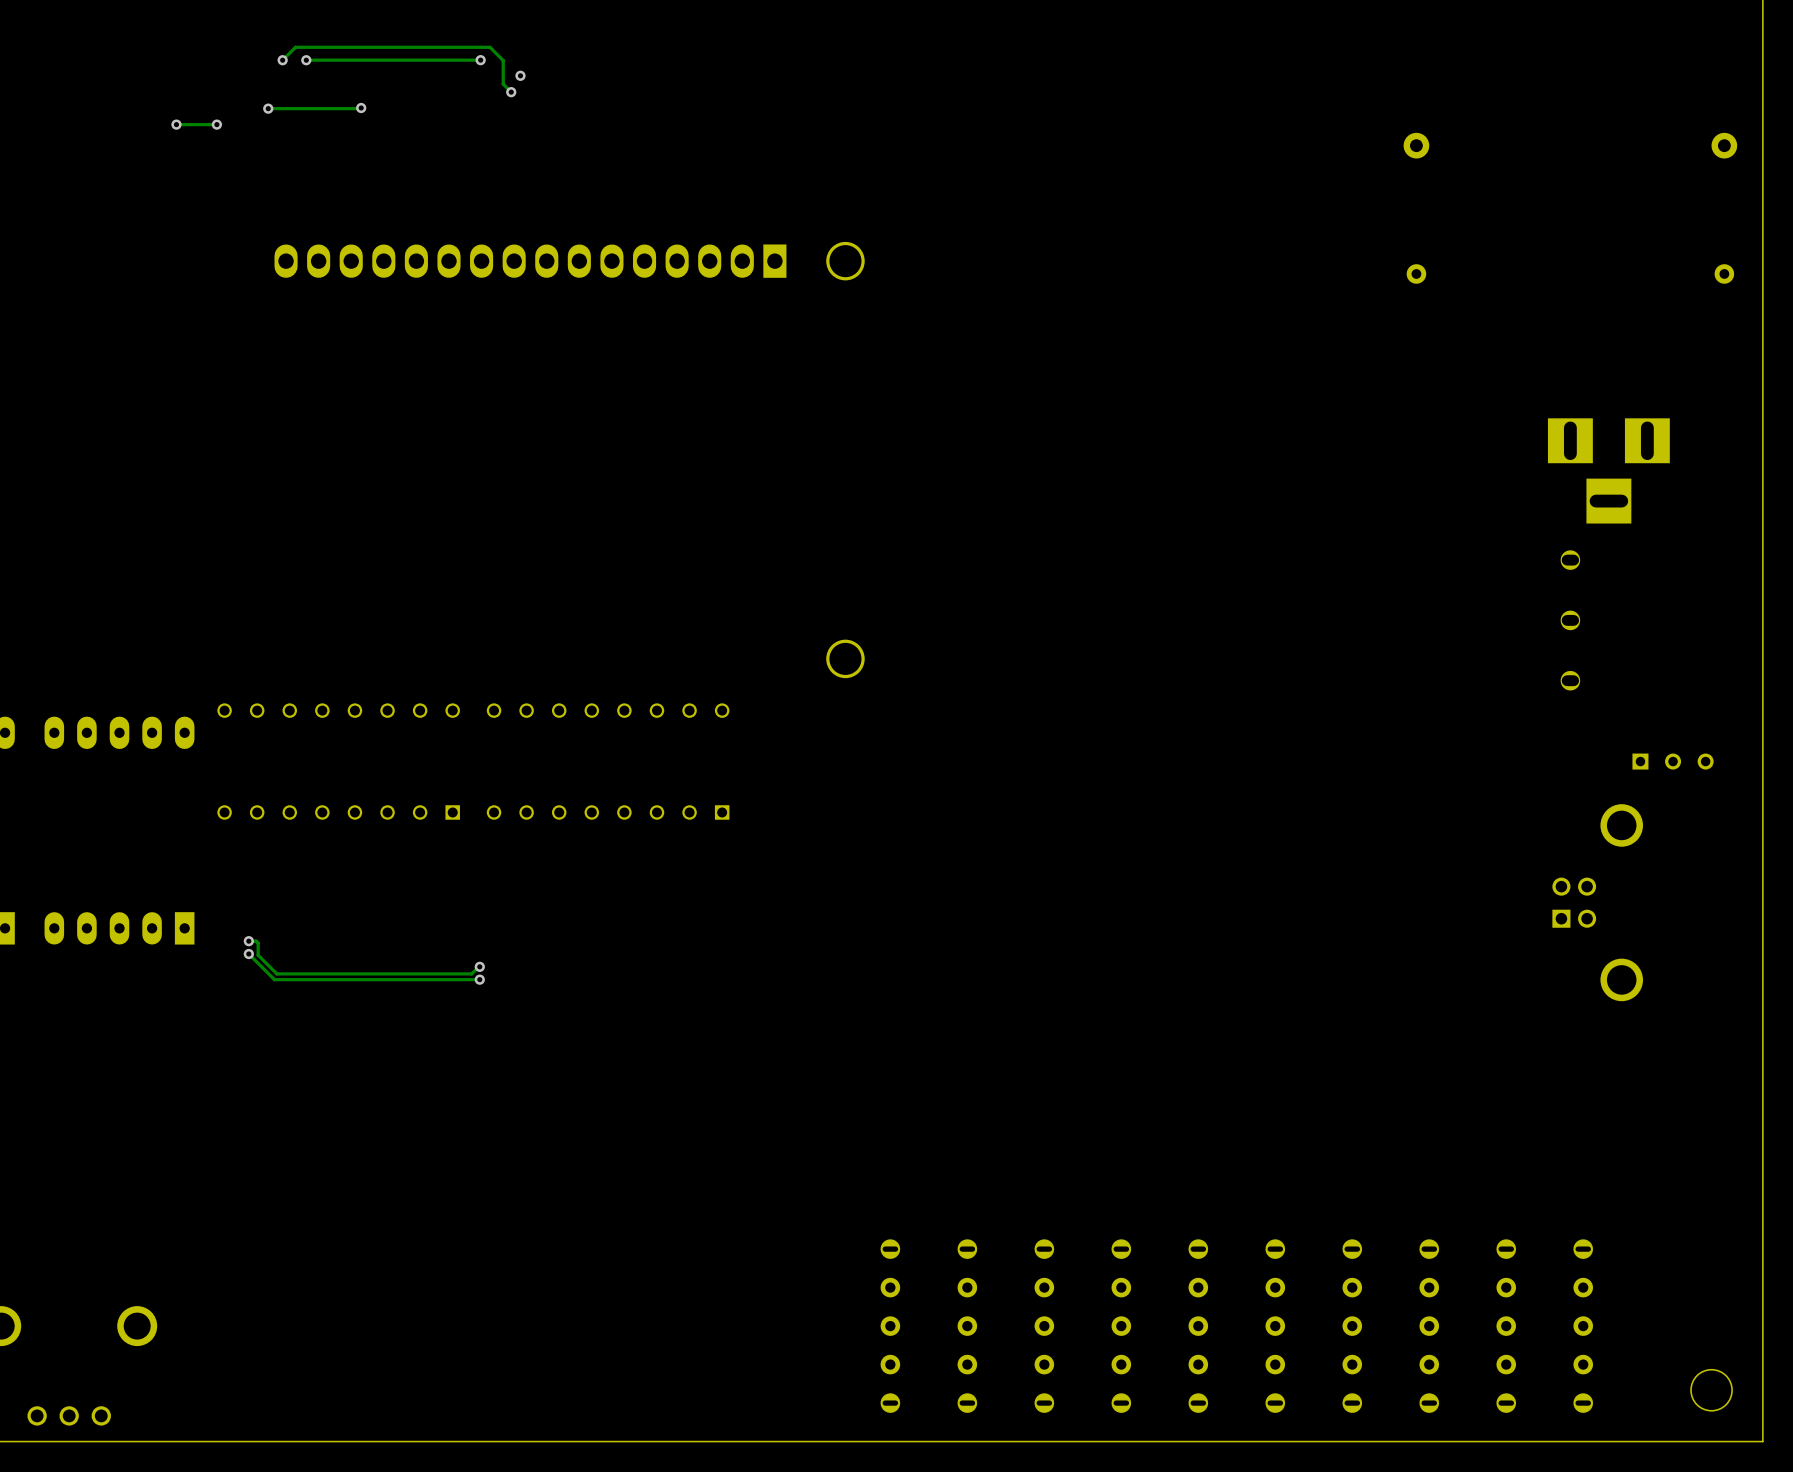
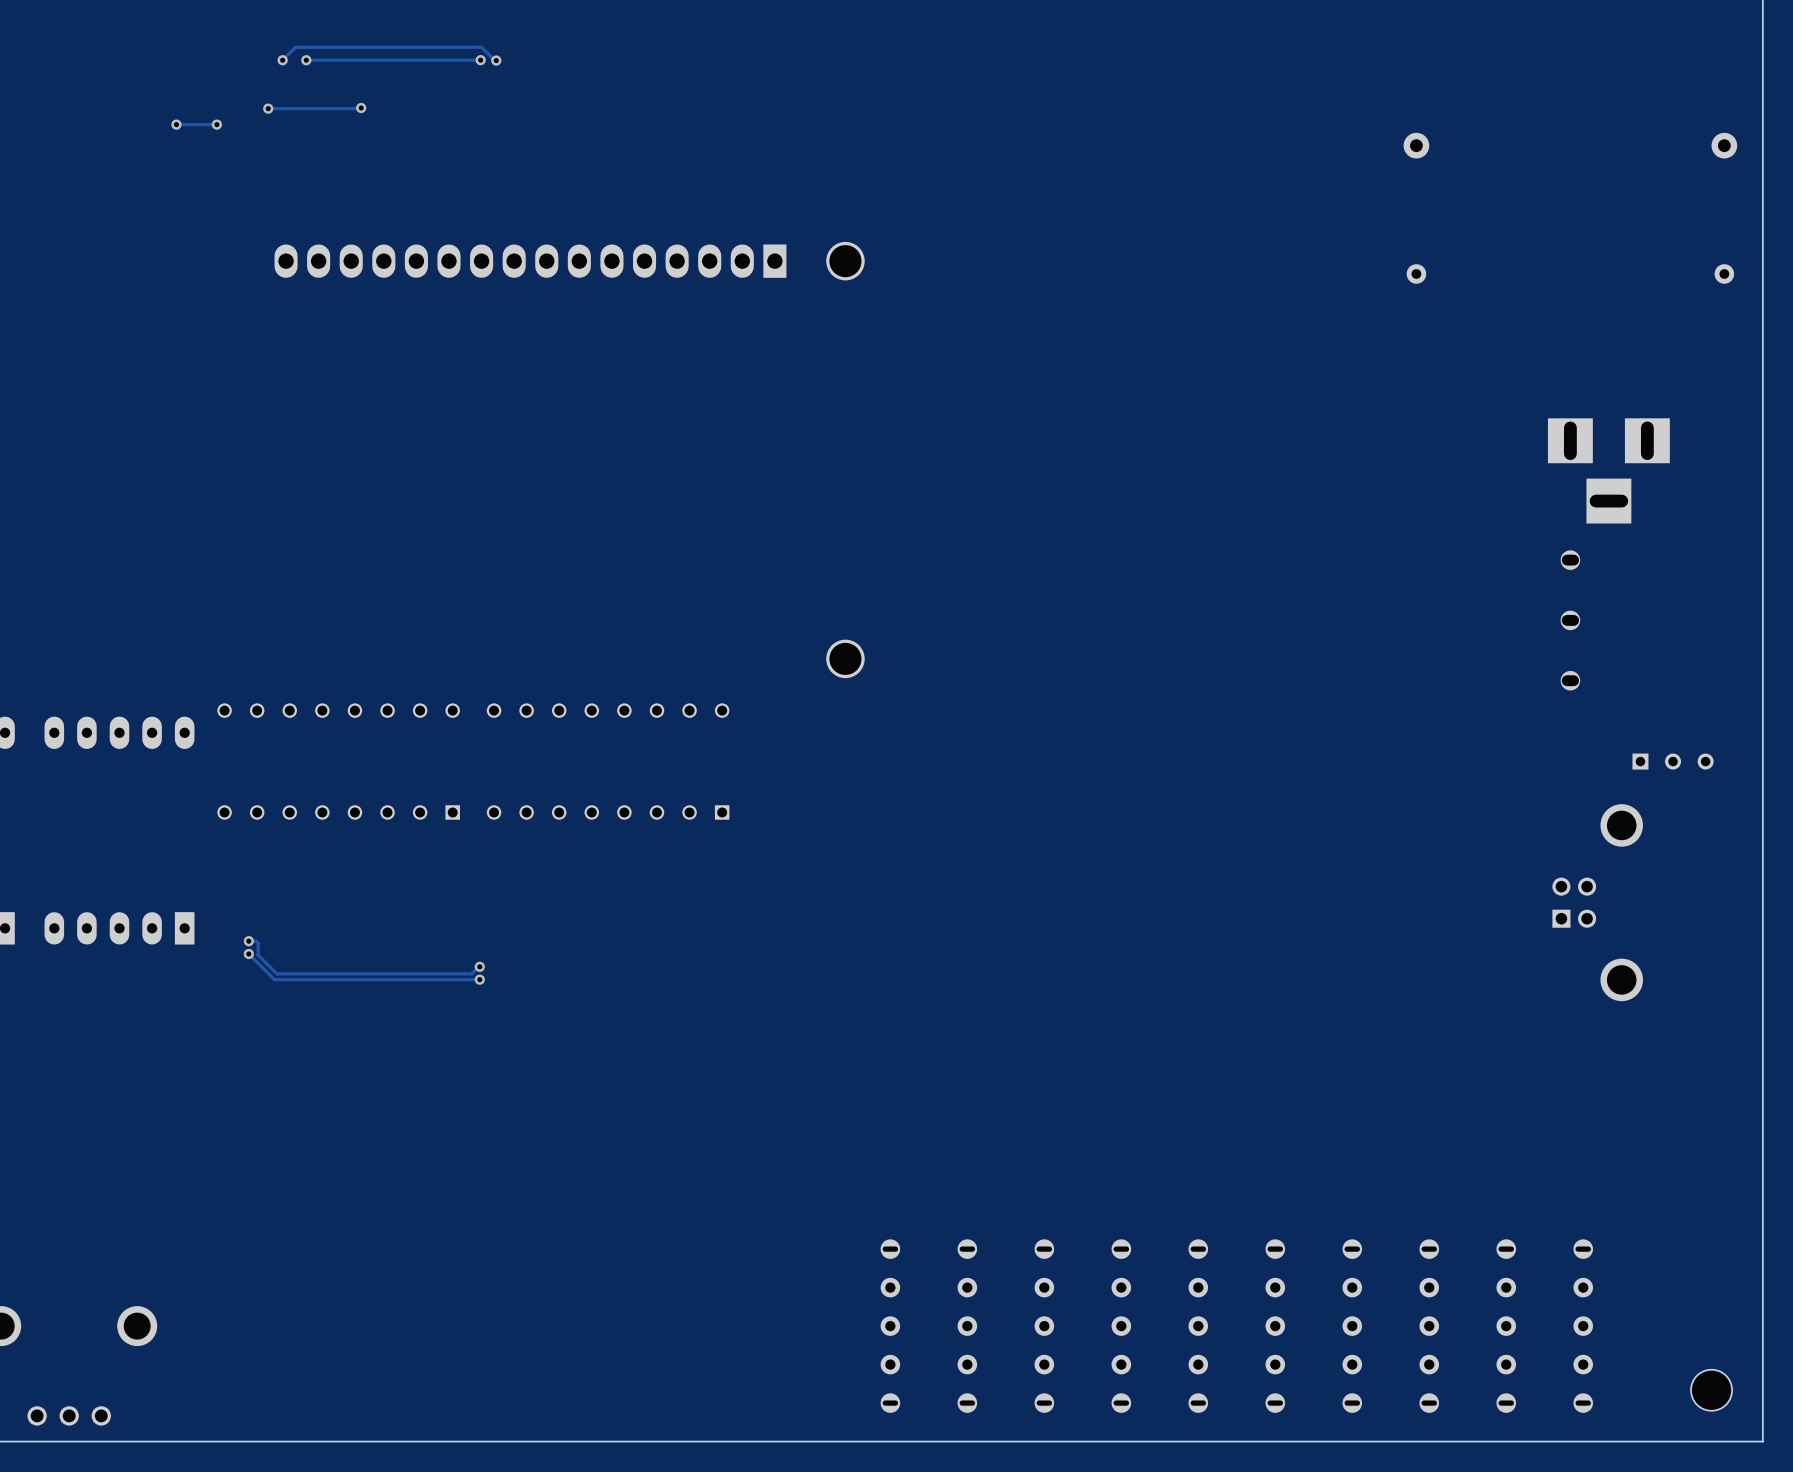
track: (481, 47) (489, 47) (503, 60) (503, 84) (511, 92) -> (481, 47) (496, 60)
via: none -> (496, 60)
via: (520, 75) -> none
via: (511, 92) -> none

